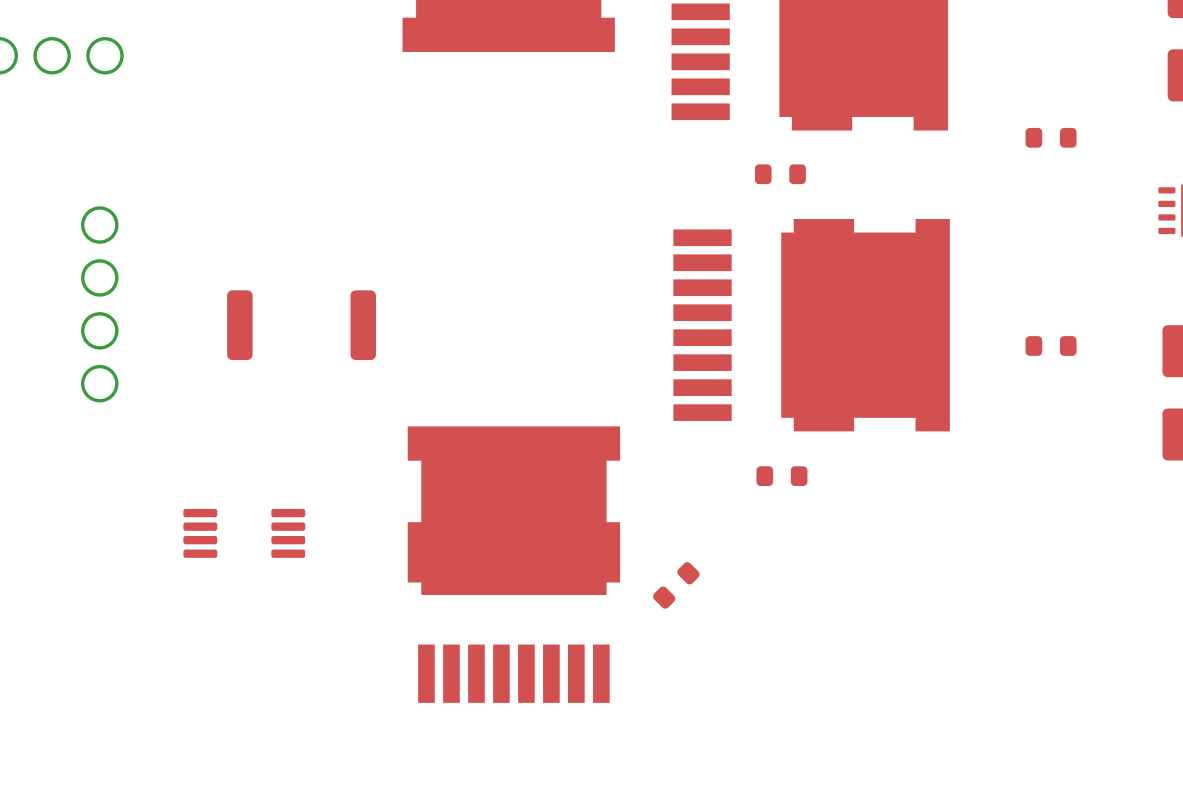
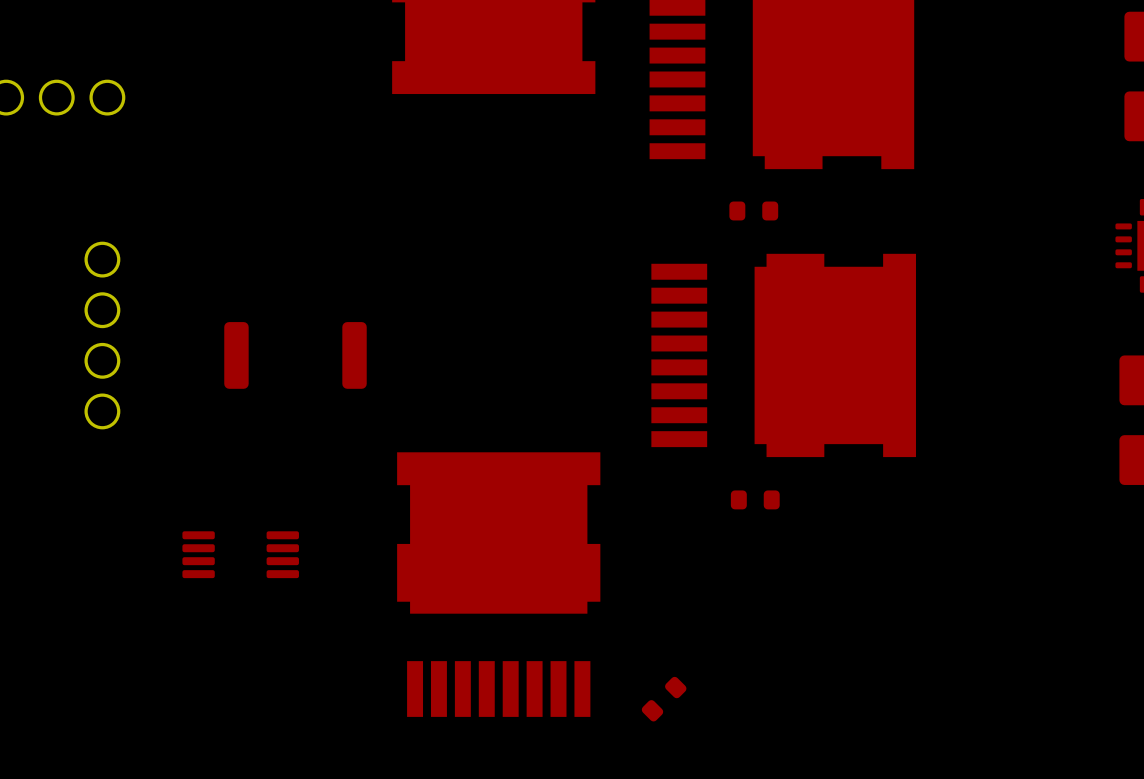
part: (1051, 137) -> none
part: (1051, 346) -> none
part position: (676, 585) -> (664, 699)

